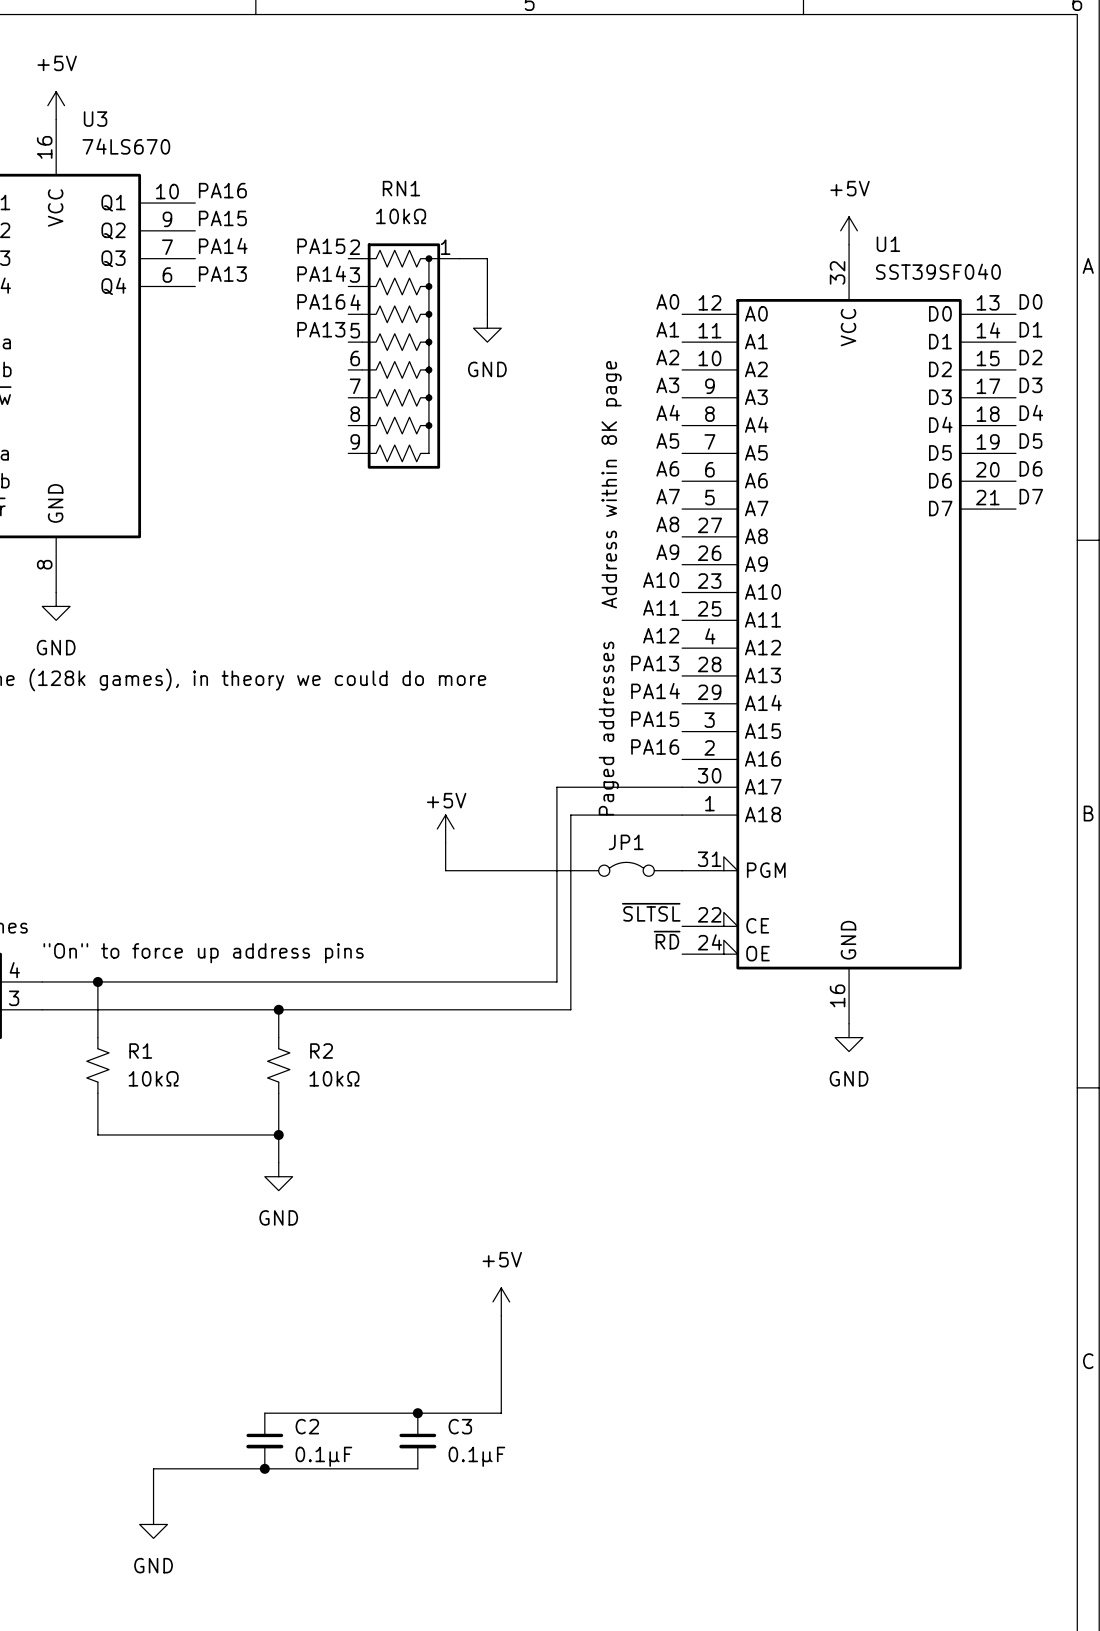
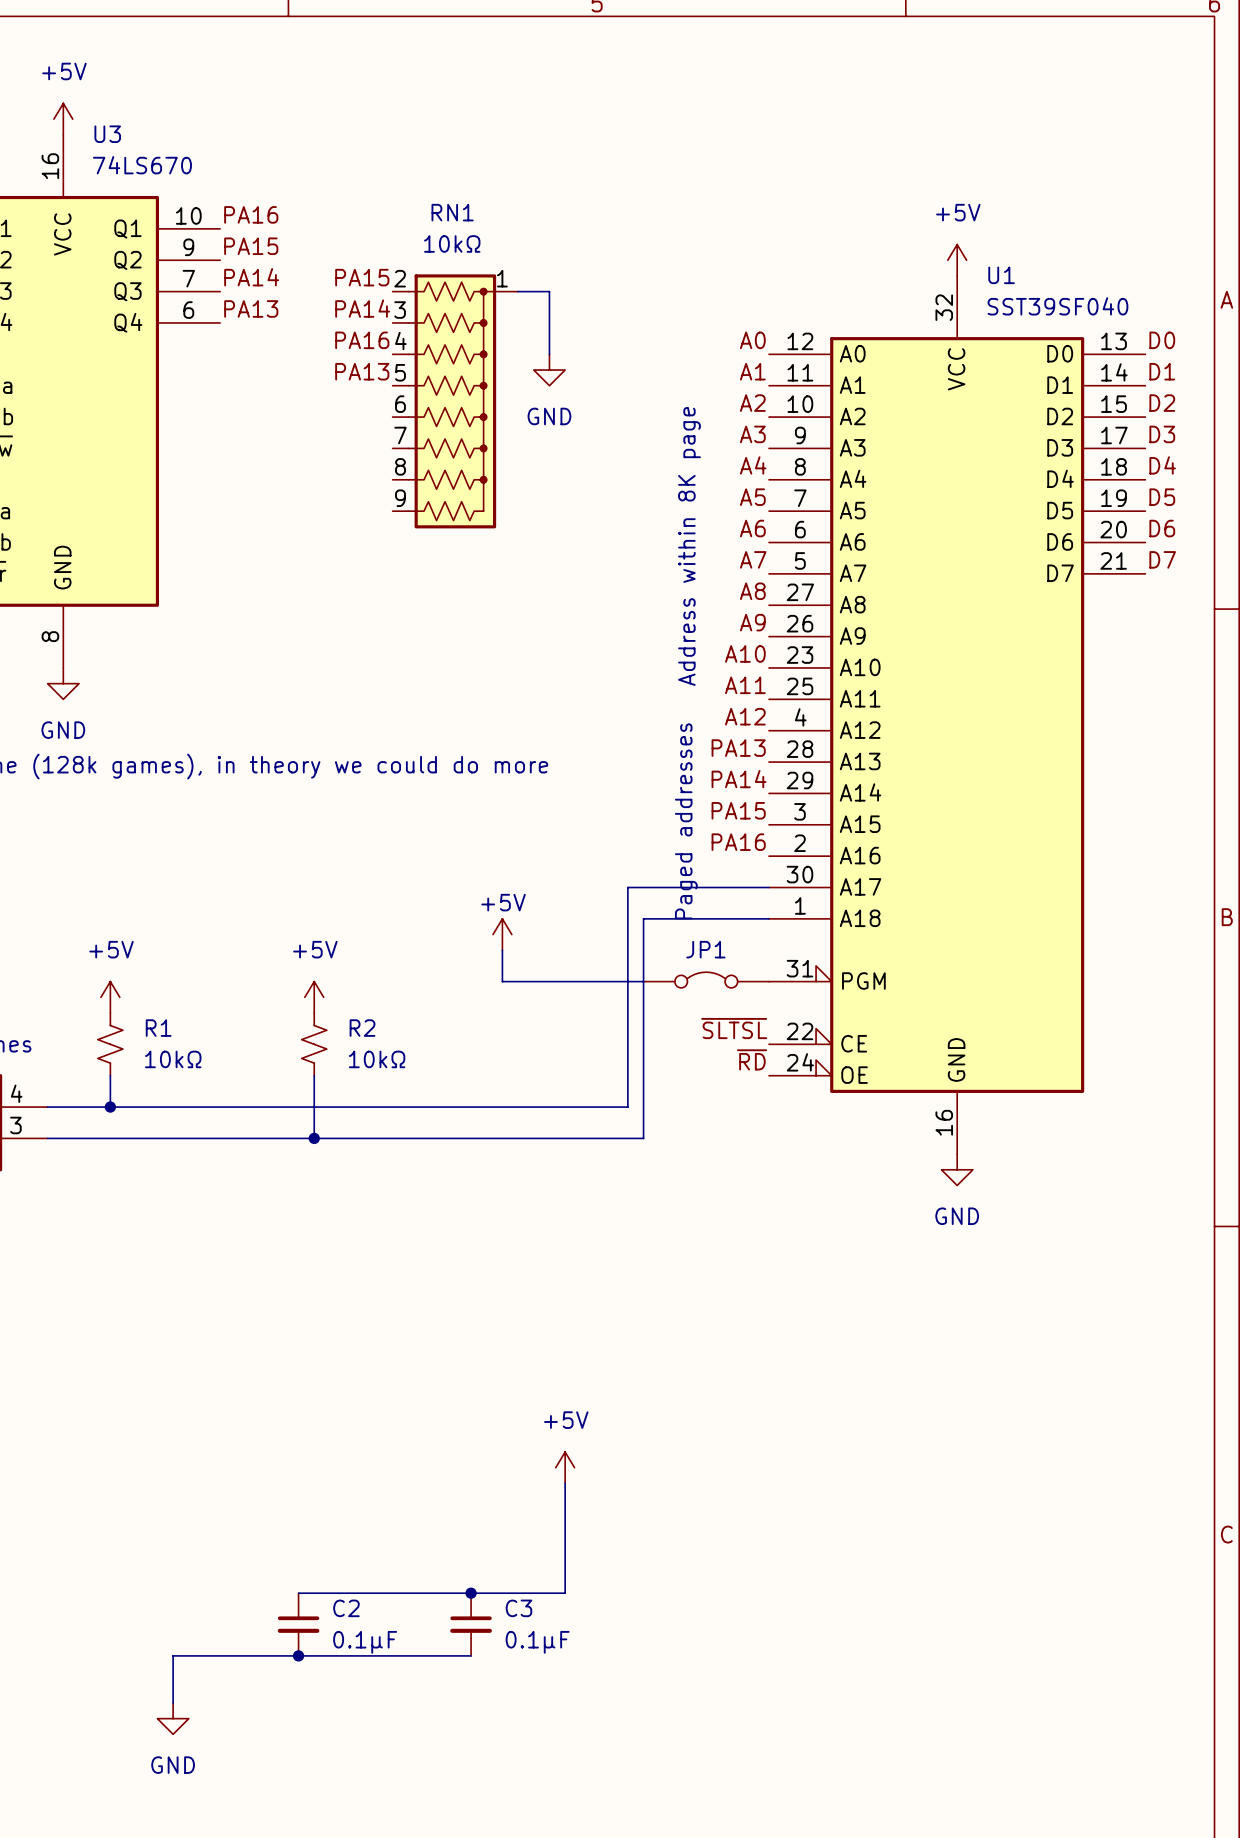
power symbol: none -> +5V (110, 997)
power symbol: none -> +5V (314, 997)
text: "On" to force up address pins (203, 953) -> none
wire: (97, 981) (97, 1037) -> (110, 1107) (110, 1075)
wire: (278, 1009) (278, 1037) -> (314, 1138) (314, 1075)
R1 position: (97, 1065) -> (110, 1044)
R2 position: (278, 1065) -> (314, 1044)
wire: (97, 1093) (97, 1134) (278, 1134) -> none
wire: (278, 1093) (278, 1162) -> none
junction: (278, 1134) -> none
power symbol: GND (278, 1176) -> none

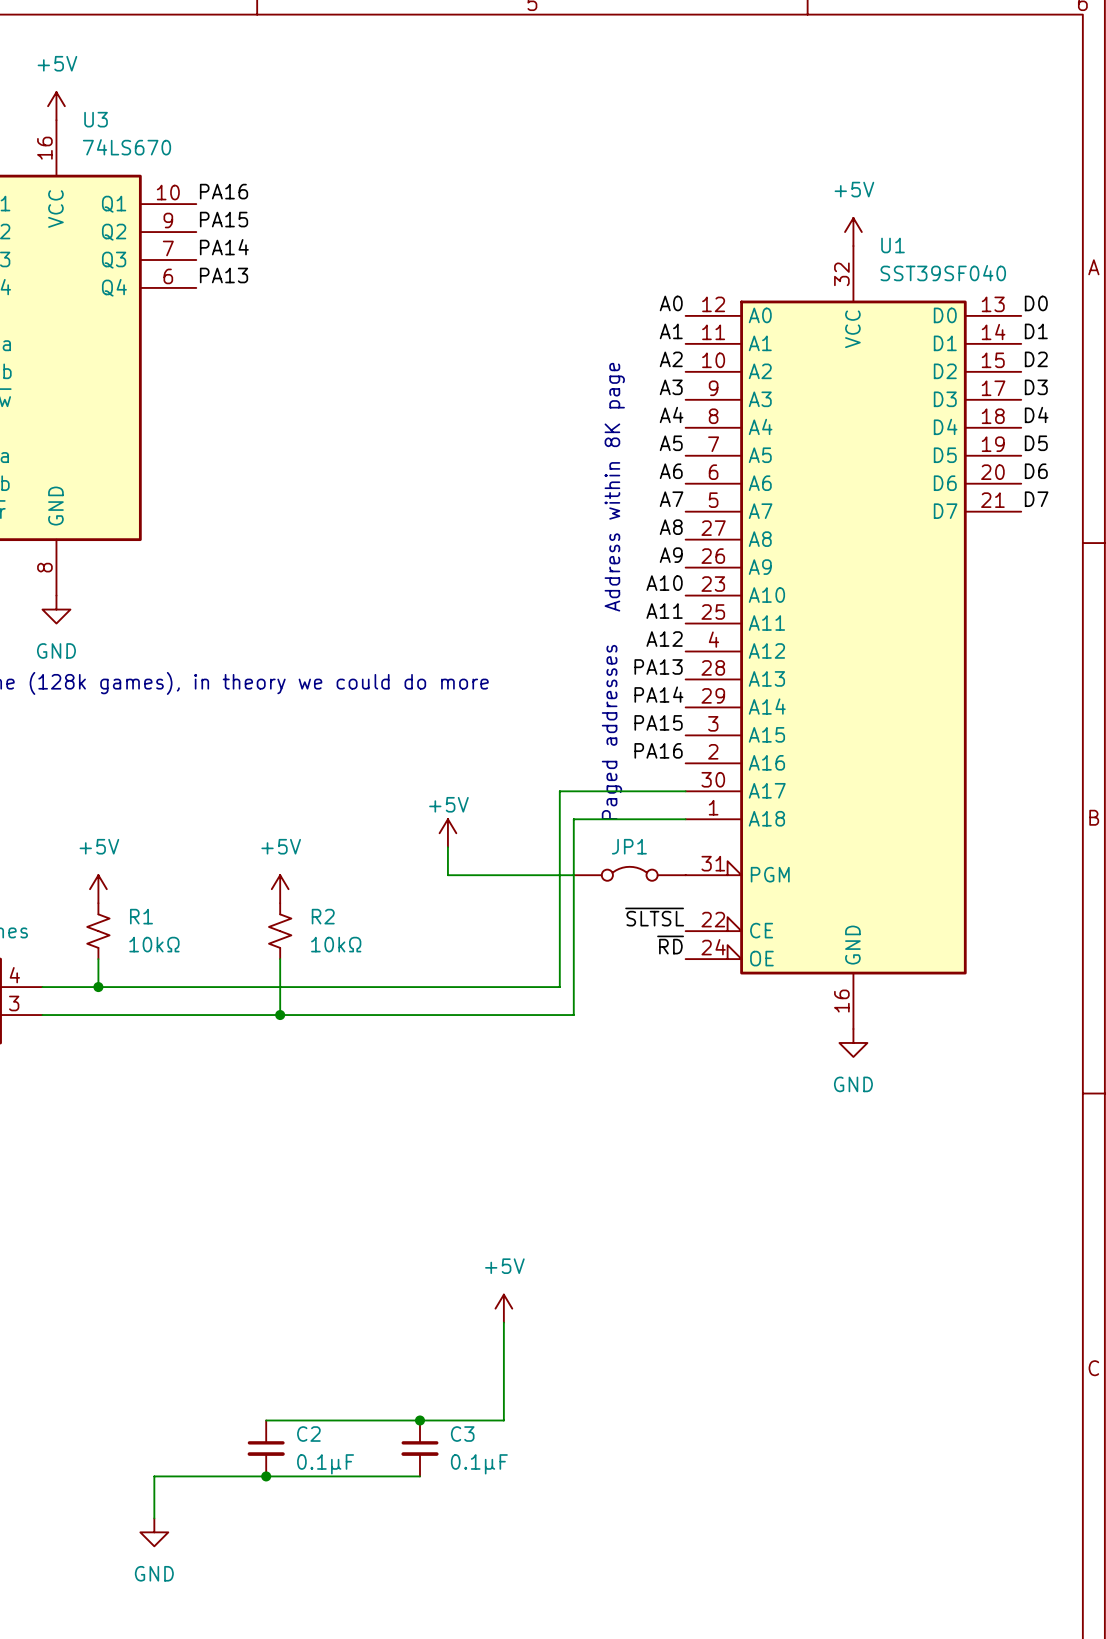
label: PA15 (362, 277) -> none
wire: (518, 291) (549, 291) (549, 354) -> none
label: PA14 (362, 308) -> none
label: PA16 (362, 340) -> none
power symbol: GND (549, 370) -> none
label: PA13 (362, 371) -> none
RN1: 10kΩ (455, 401) -> none

